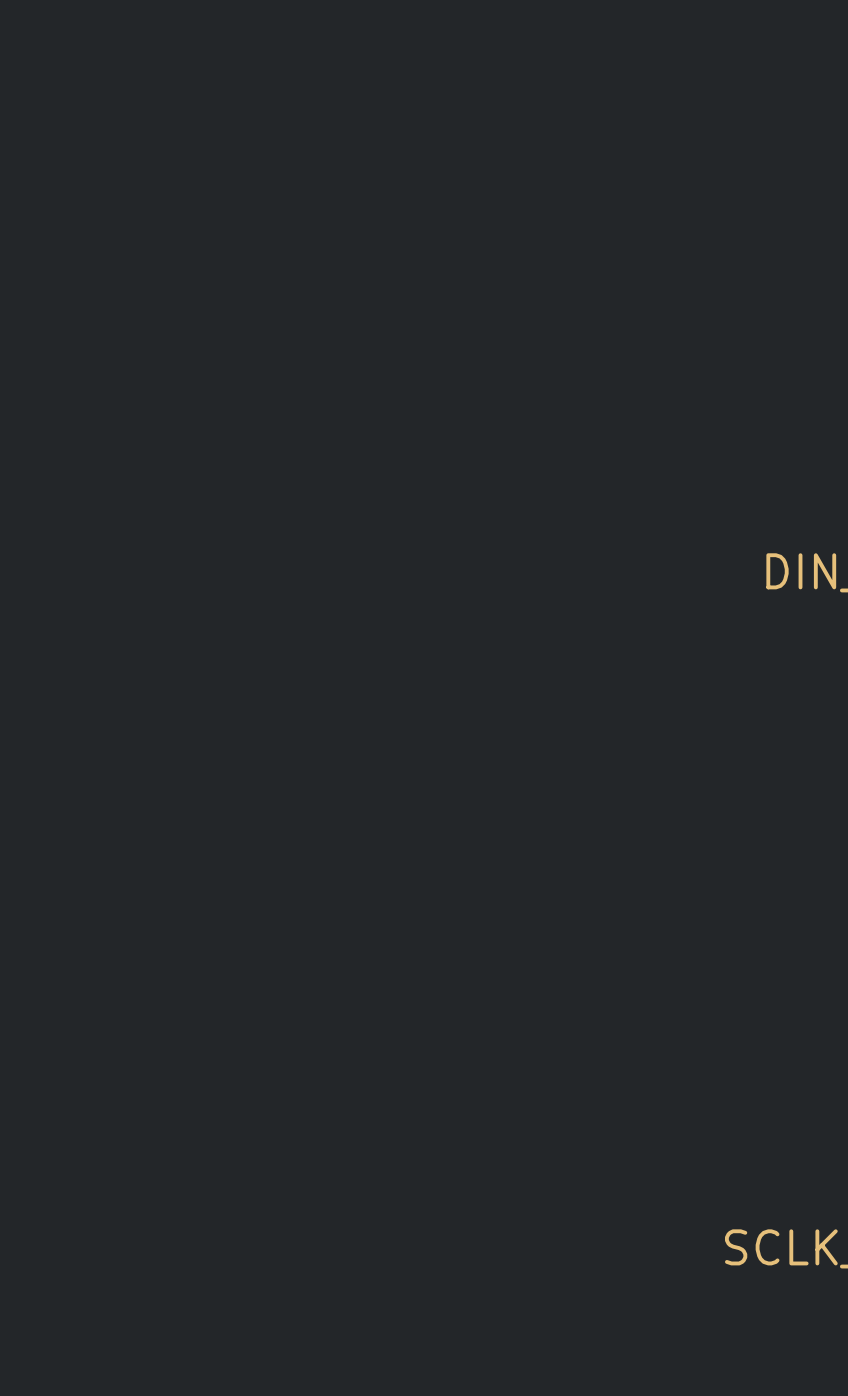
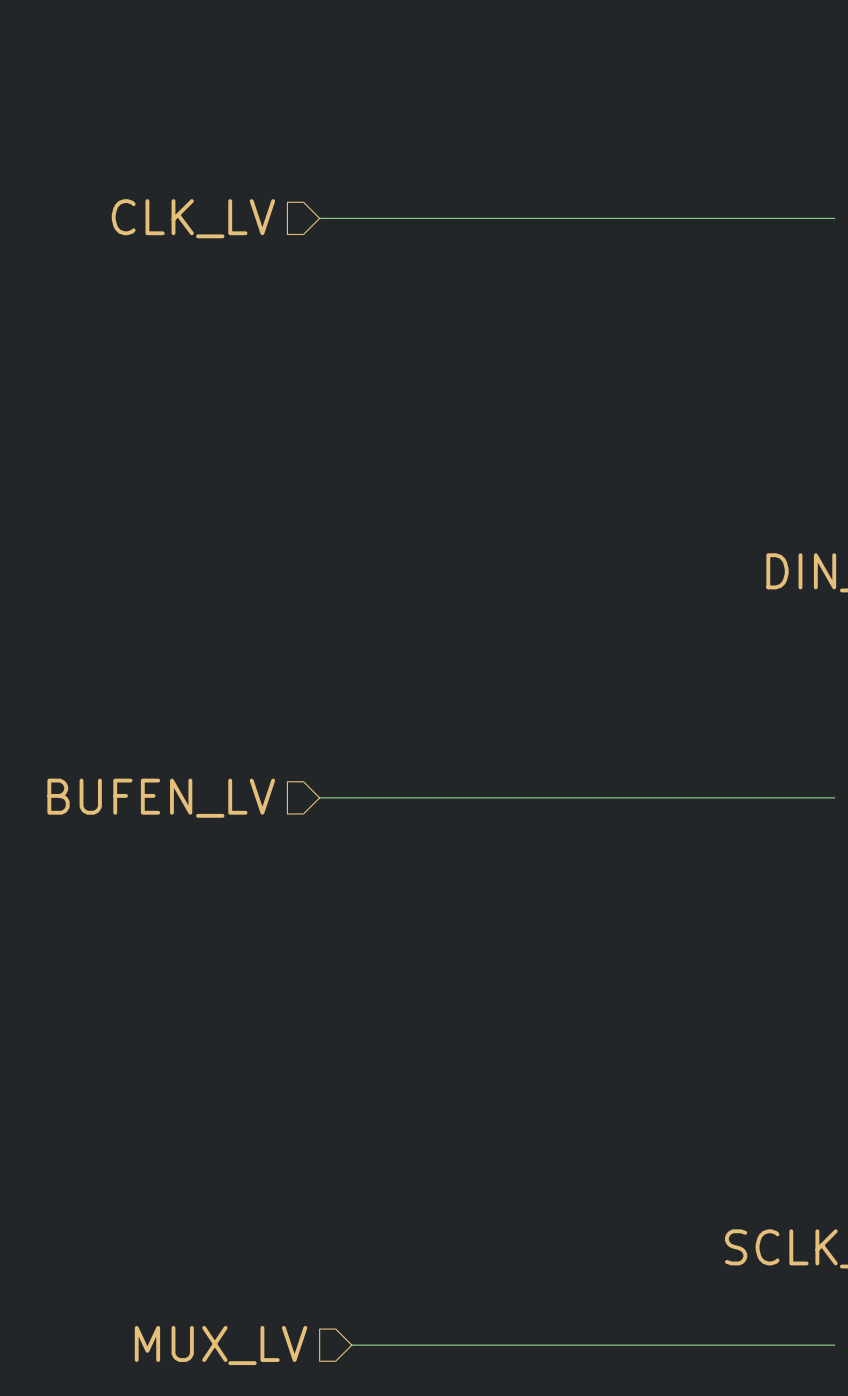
hierarchical label: none -> CLK_LV (193, 218)
wire: none -> (319, 218) (834, 218)
wire: none -> (319, 797) (834, 797)
hierarchical label: none -> BUFEN_LV (161, 798)
hierarchical label: none -> MUX_LV (221, 1345)
wire: none -> (351, 1345) (834, 1345)

